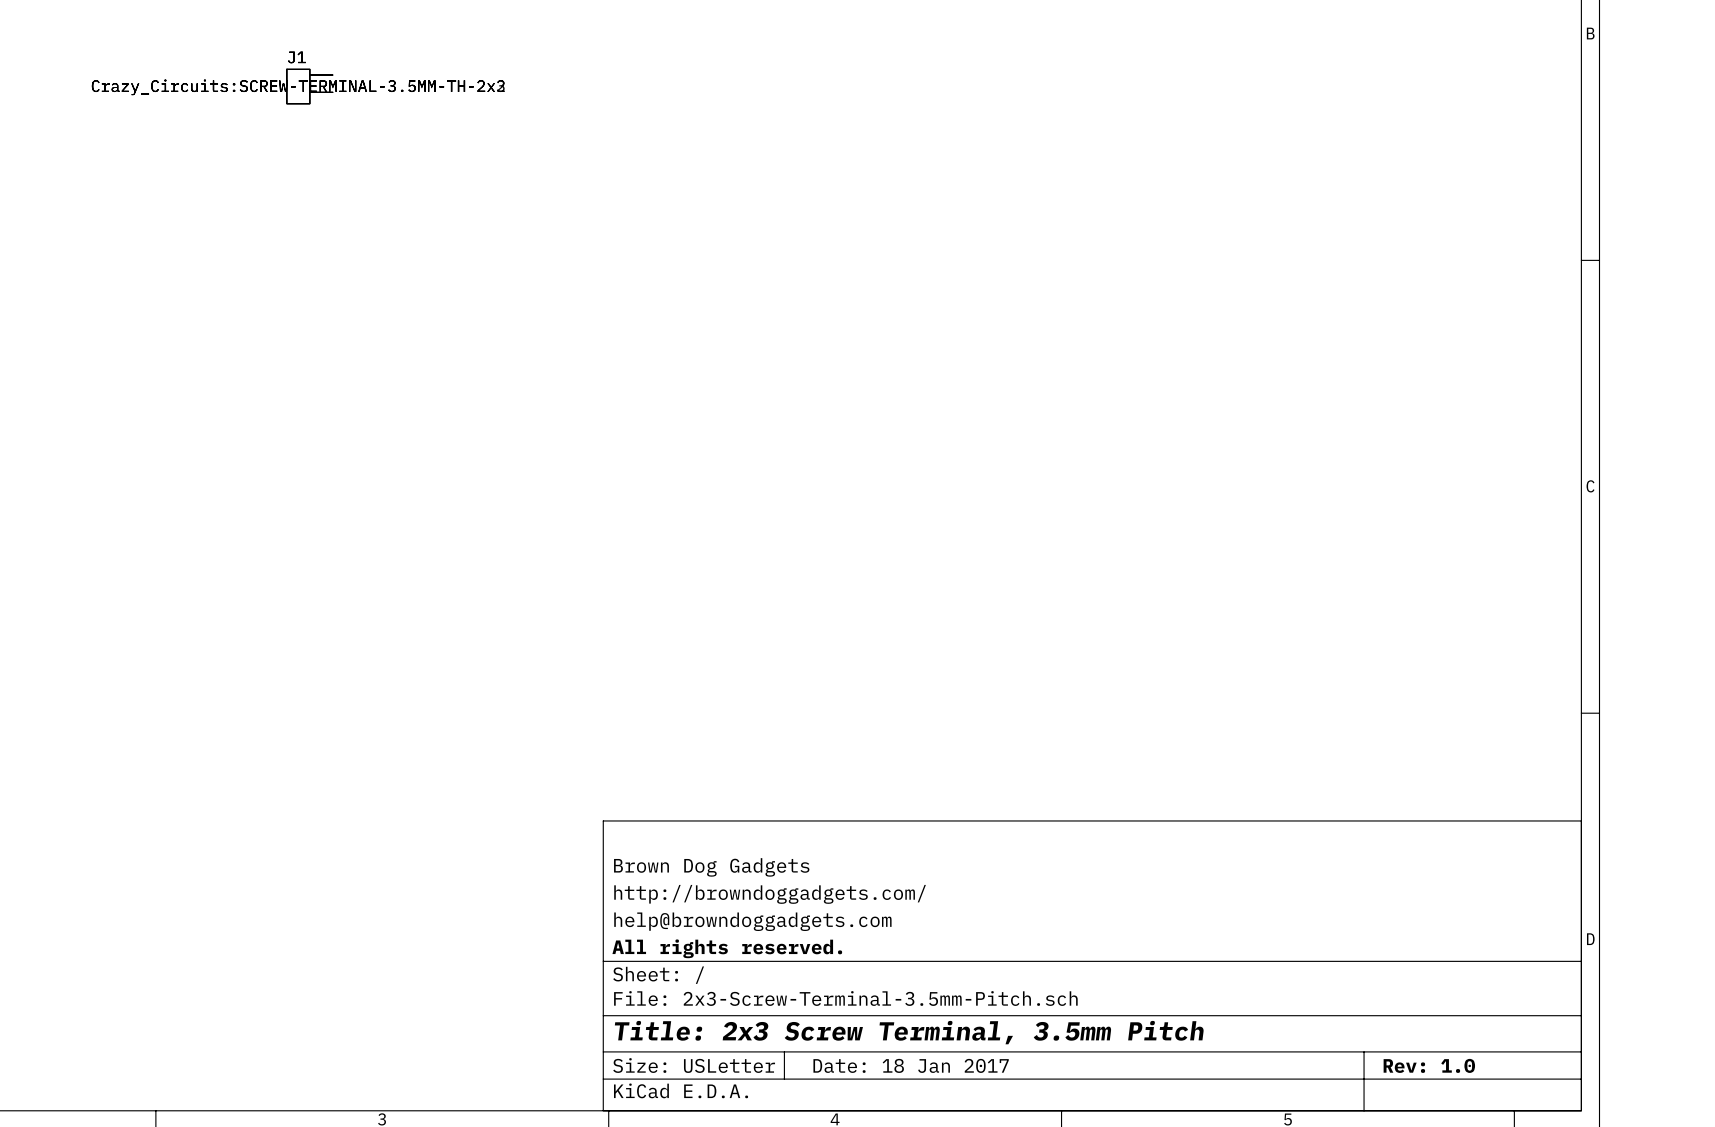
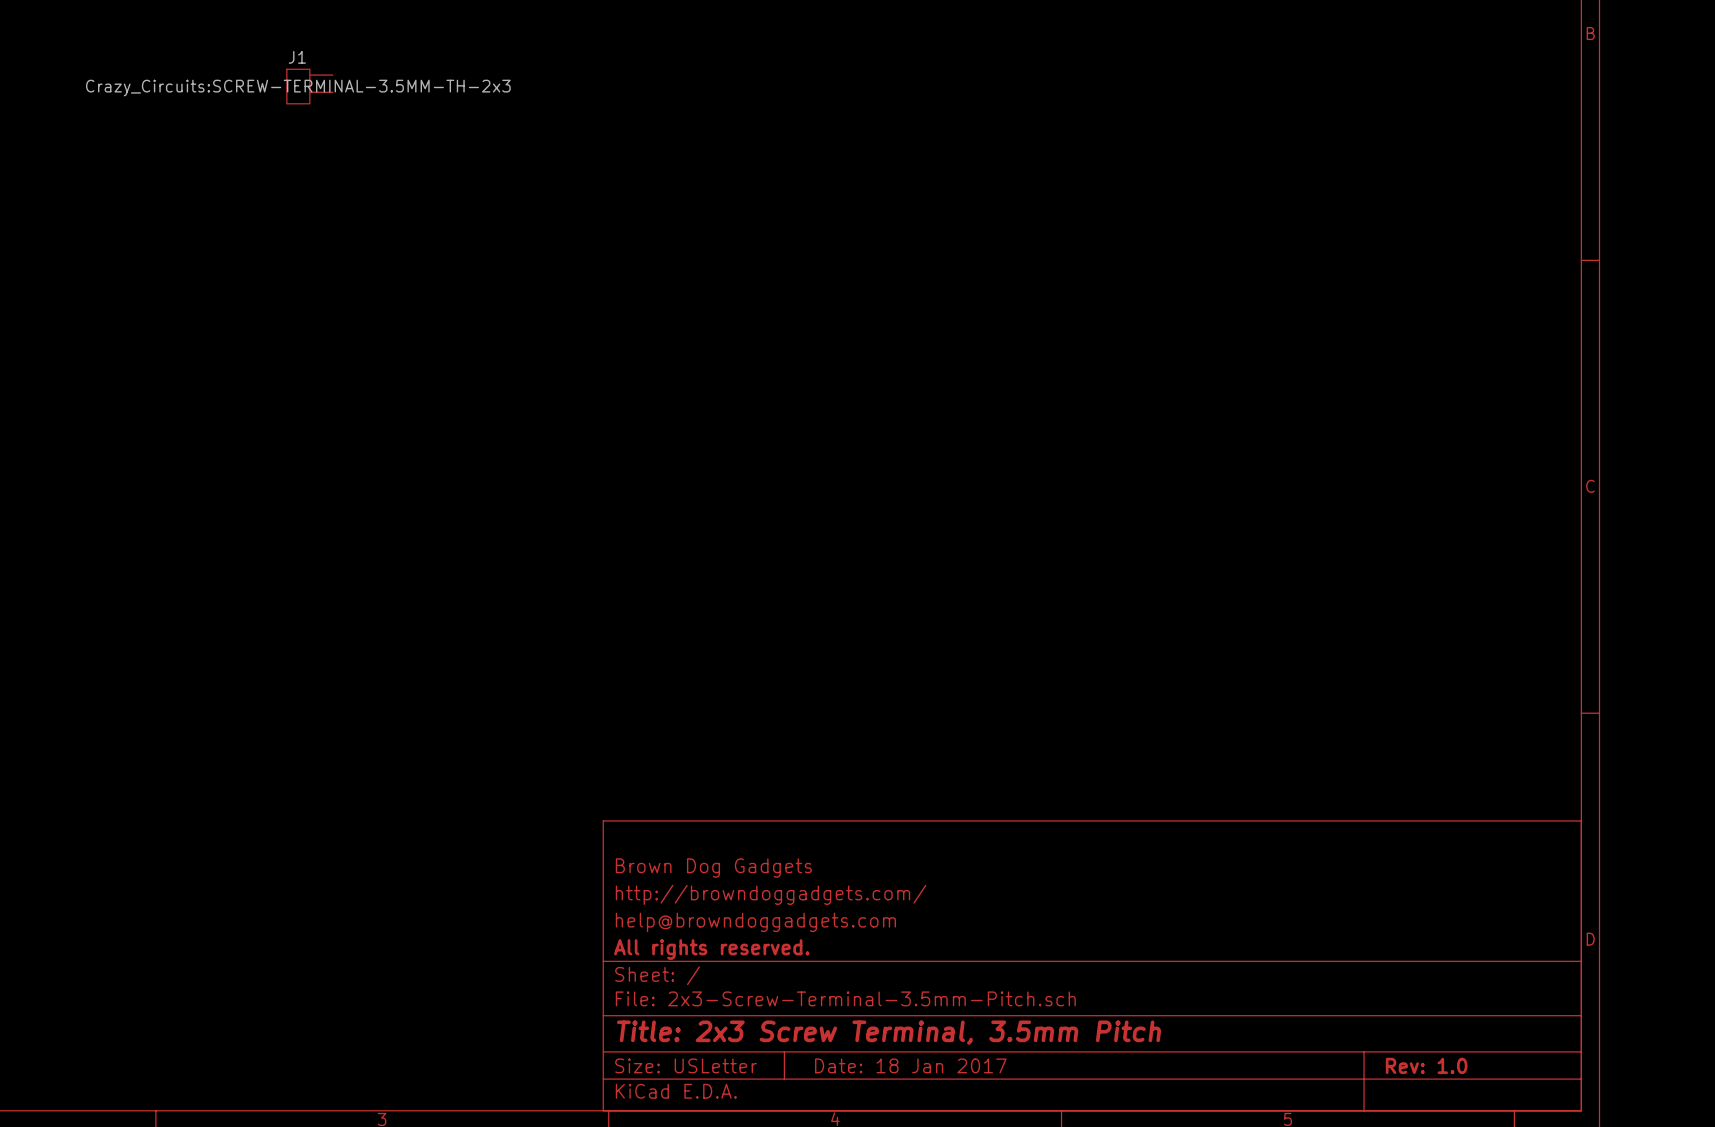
J1: (309, 86) -> none

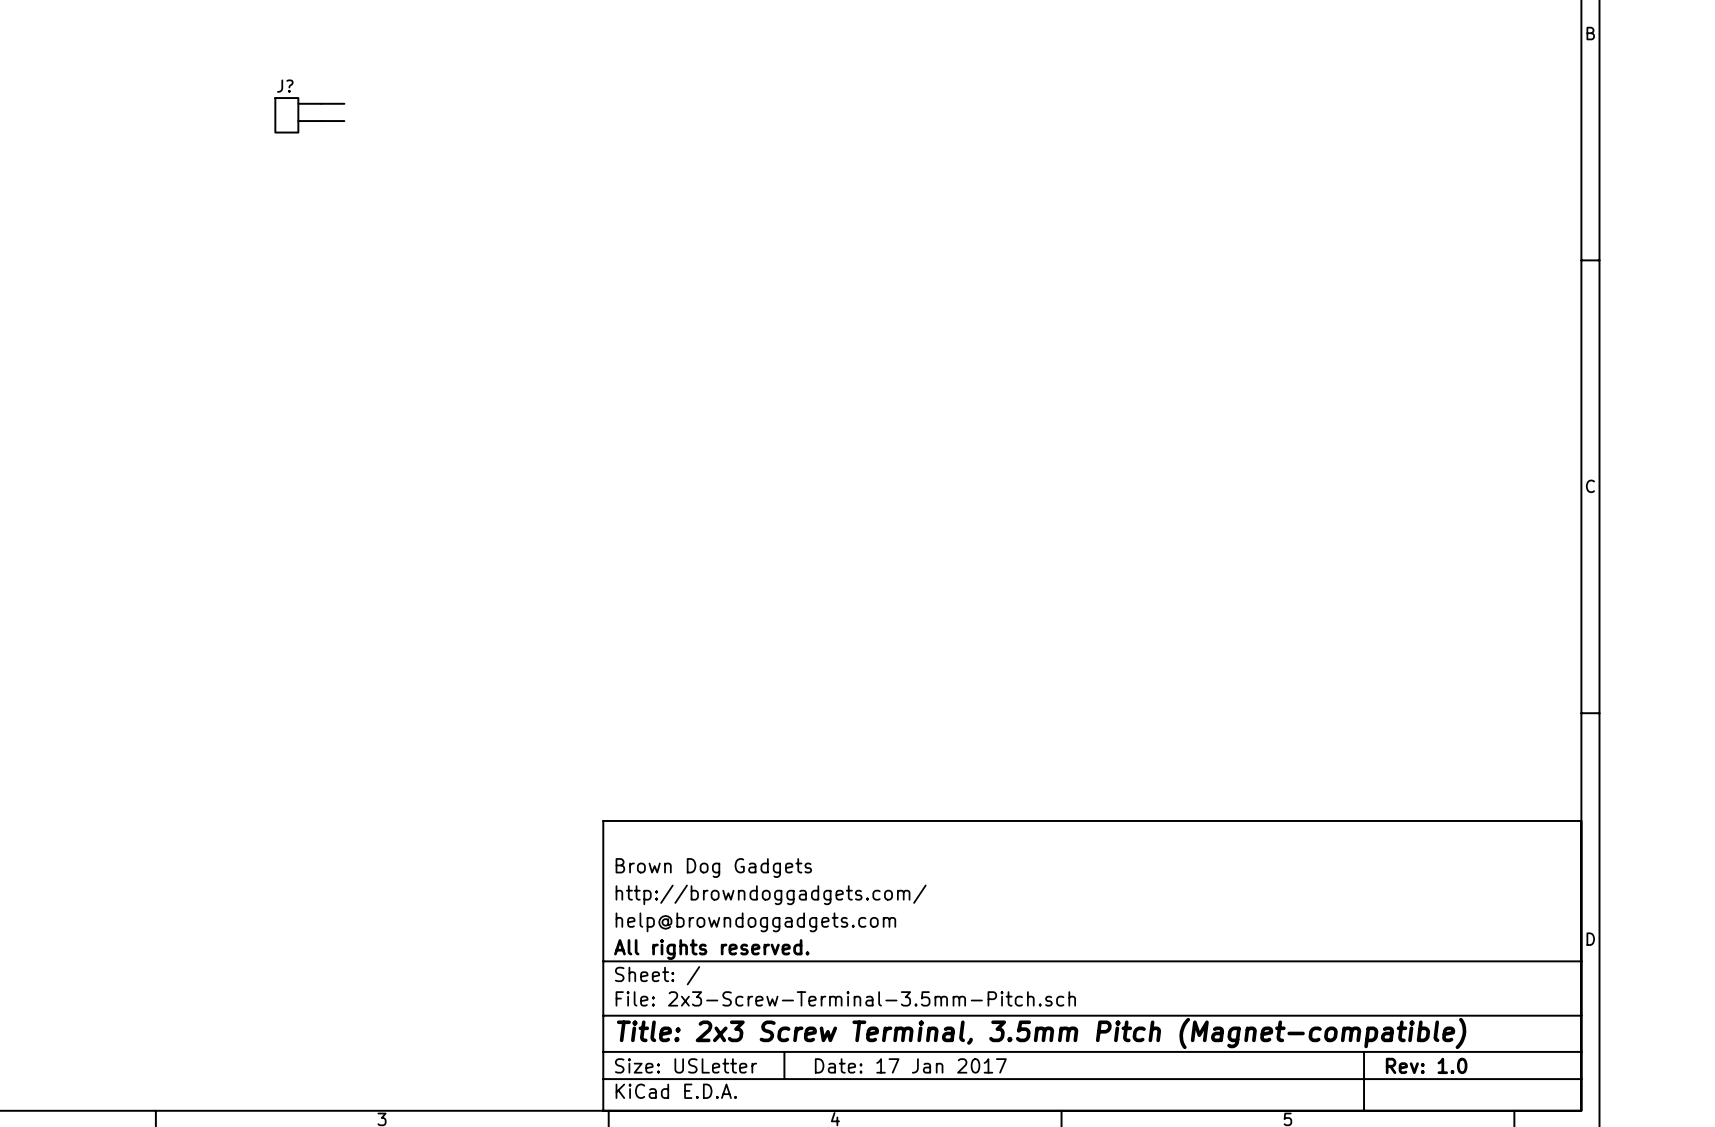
J1: (309, 86) -> none
wire: none -> (321, 103) (344, 103)
J?: none -> (298, 115)
wire: none -> (321, 121) (344, 121)
title block: Title: 2x3 Screw Terminal, 3.5mm Pitch (889, 1032) -> Title: 2x3 Screw Terminal, 3.5mm Pitch (Magnet-compatible) (1041, 1033)
title block: Date: 18 Jan 2017 (910, 1065) -> Date: 17 Jan 2017 (910, 1065)

